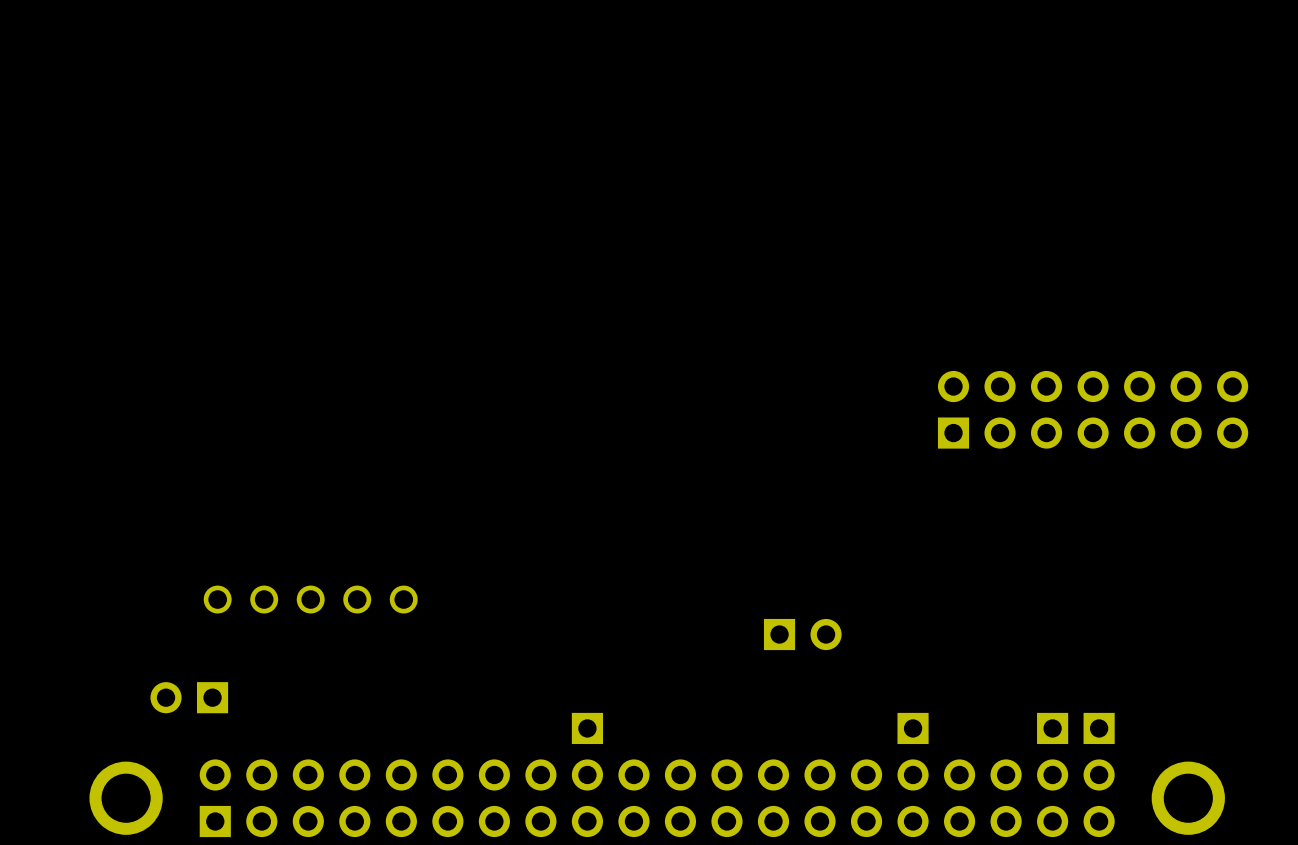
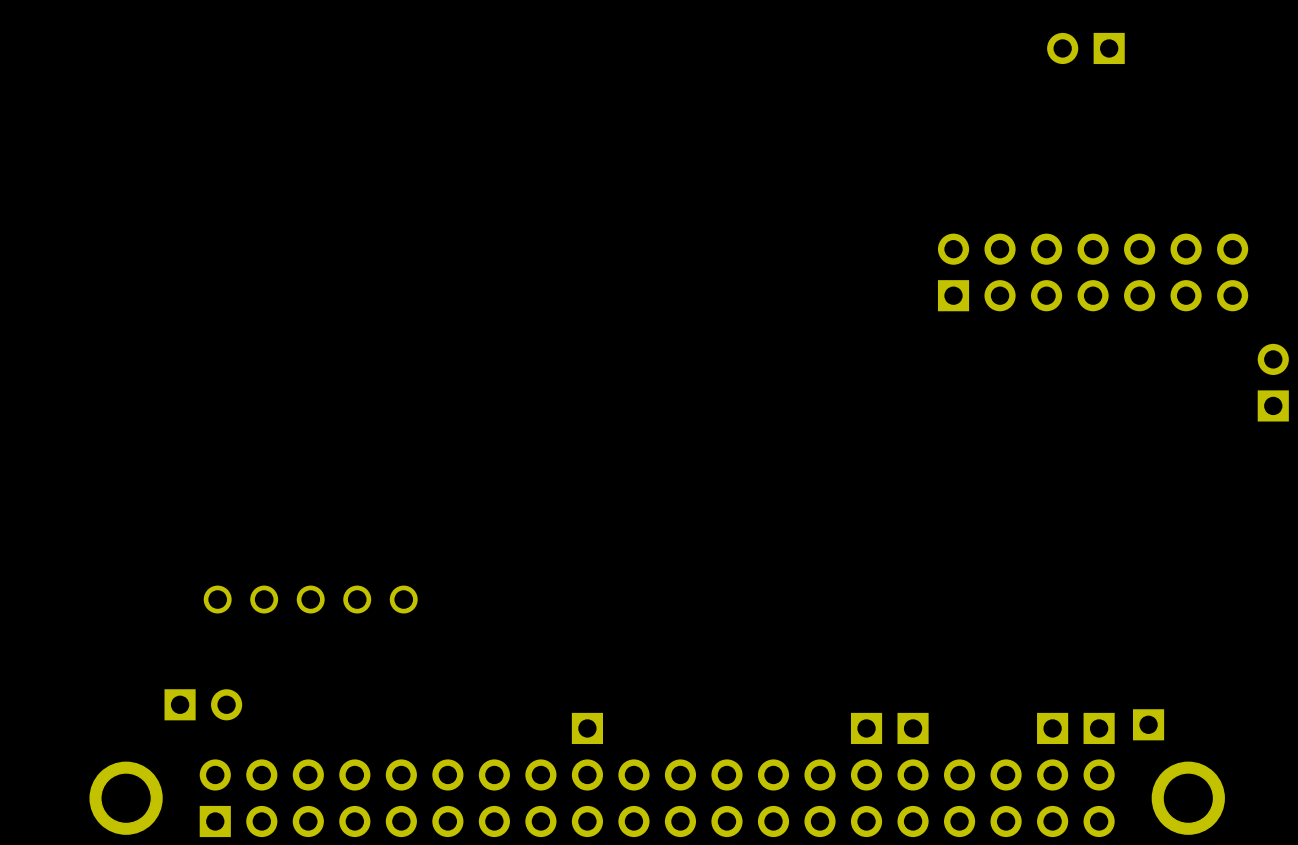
part: none -> (1085, 48)
part: none -> (1273, 382)
part position: (1093, 409) -> (1093, 272)
part: (802, 634) -> none
part rotation: 0° (189, 697) -> 180° (203, 704)
part: none -> (1148, 724)
part: none -> (866, 728)

